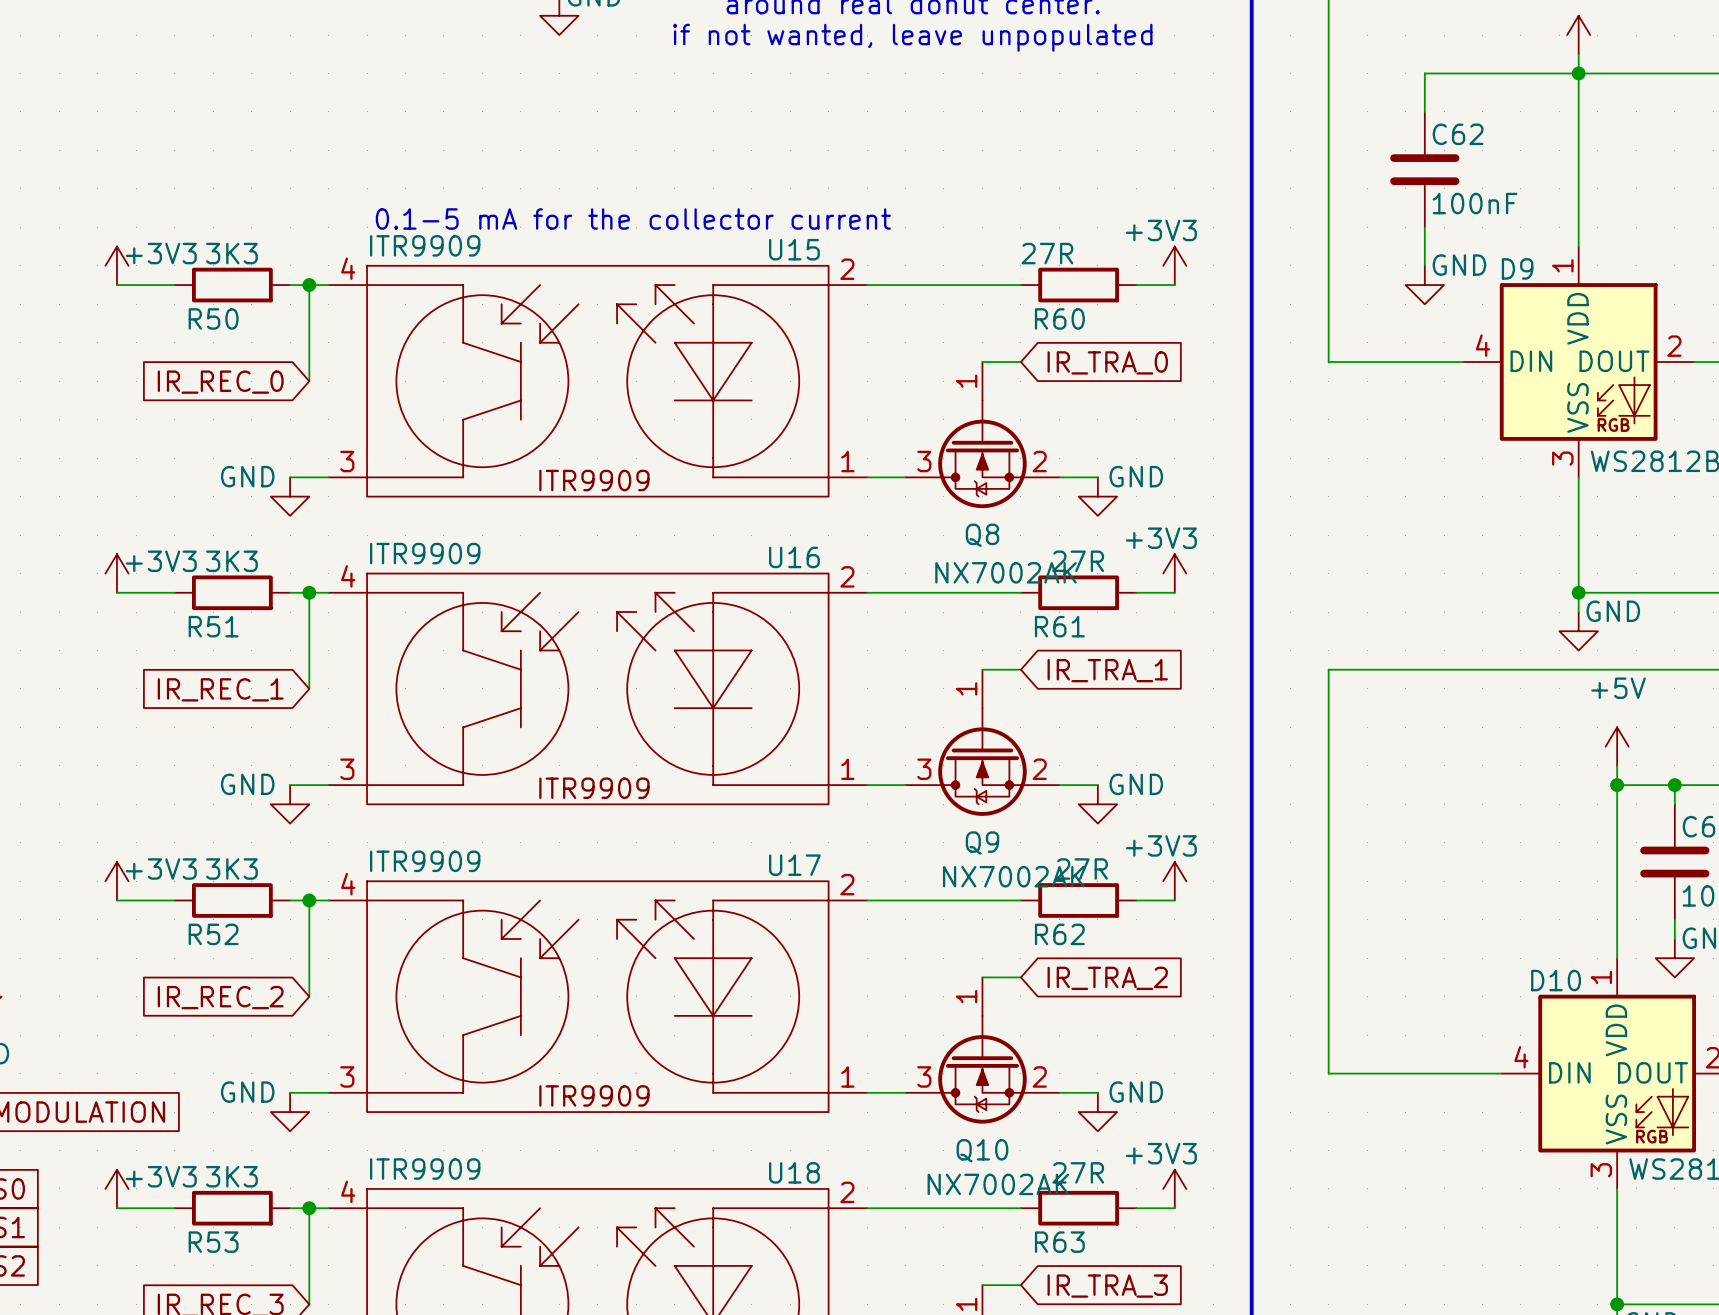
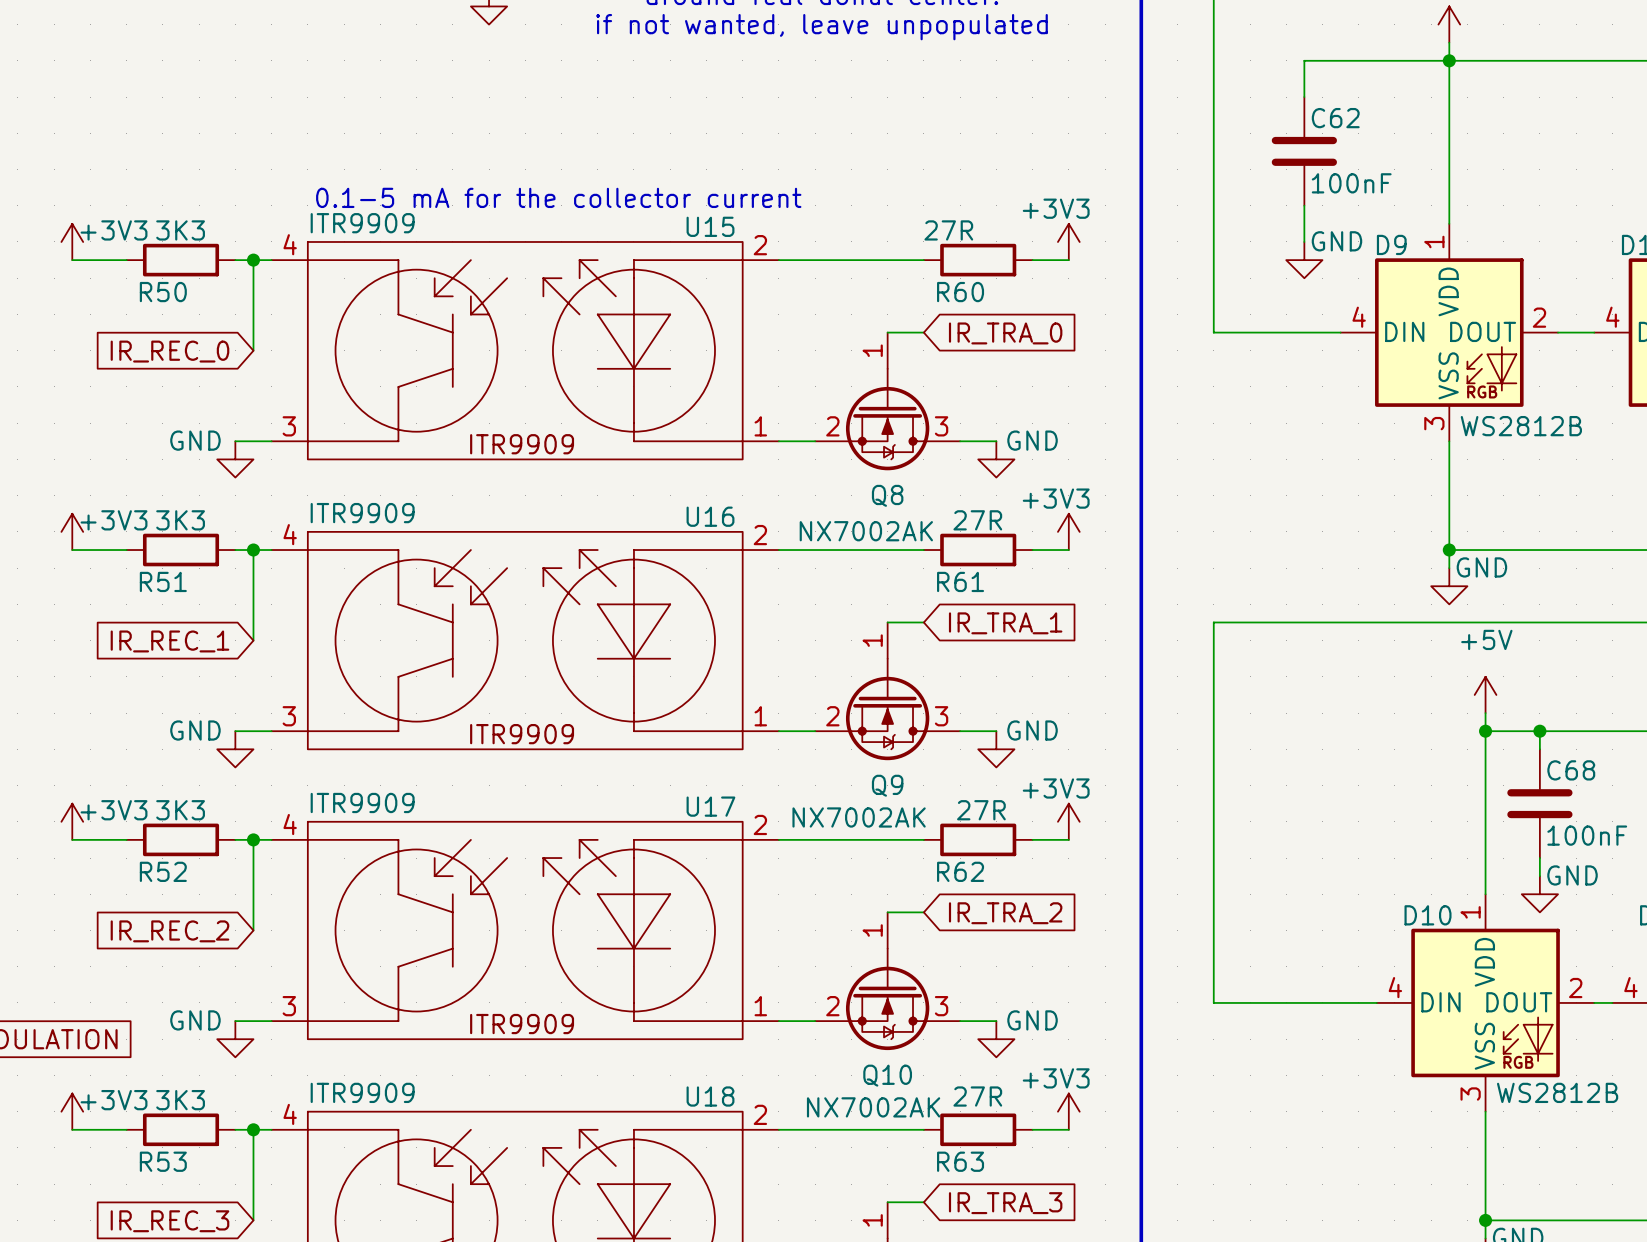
Q8 flip: as is (982, 454) -> left-right (887, 419)
Q9 flip: as is (982, 762) -> left-right (887, 709)
Q10 flip: as is (982, 1069) -> left-right (887, 999)

